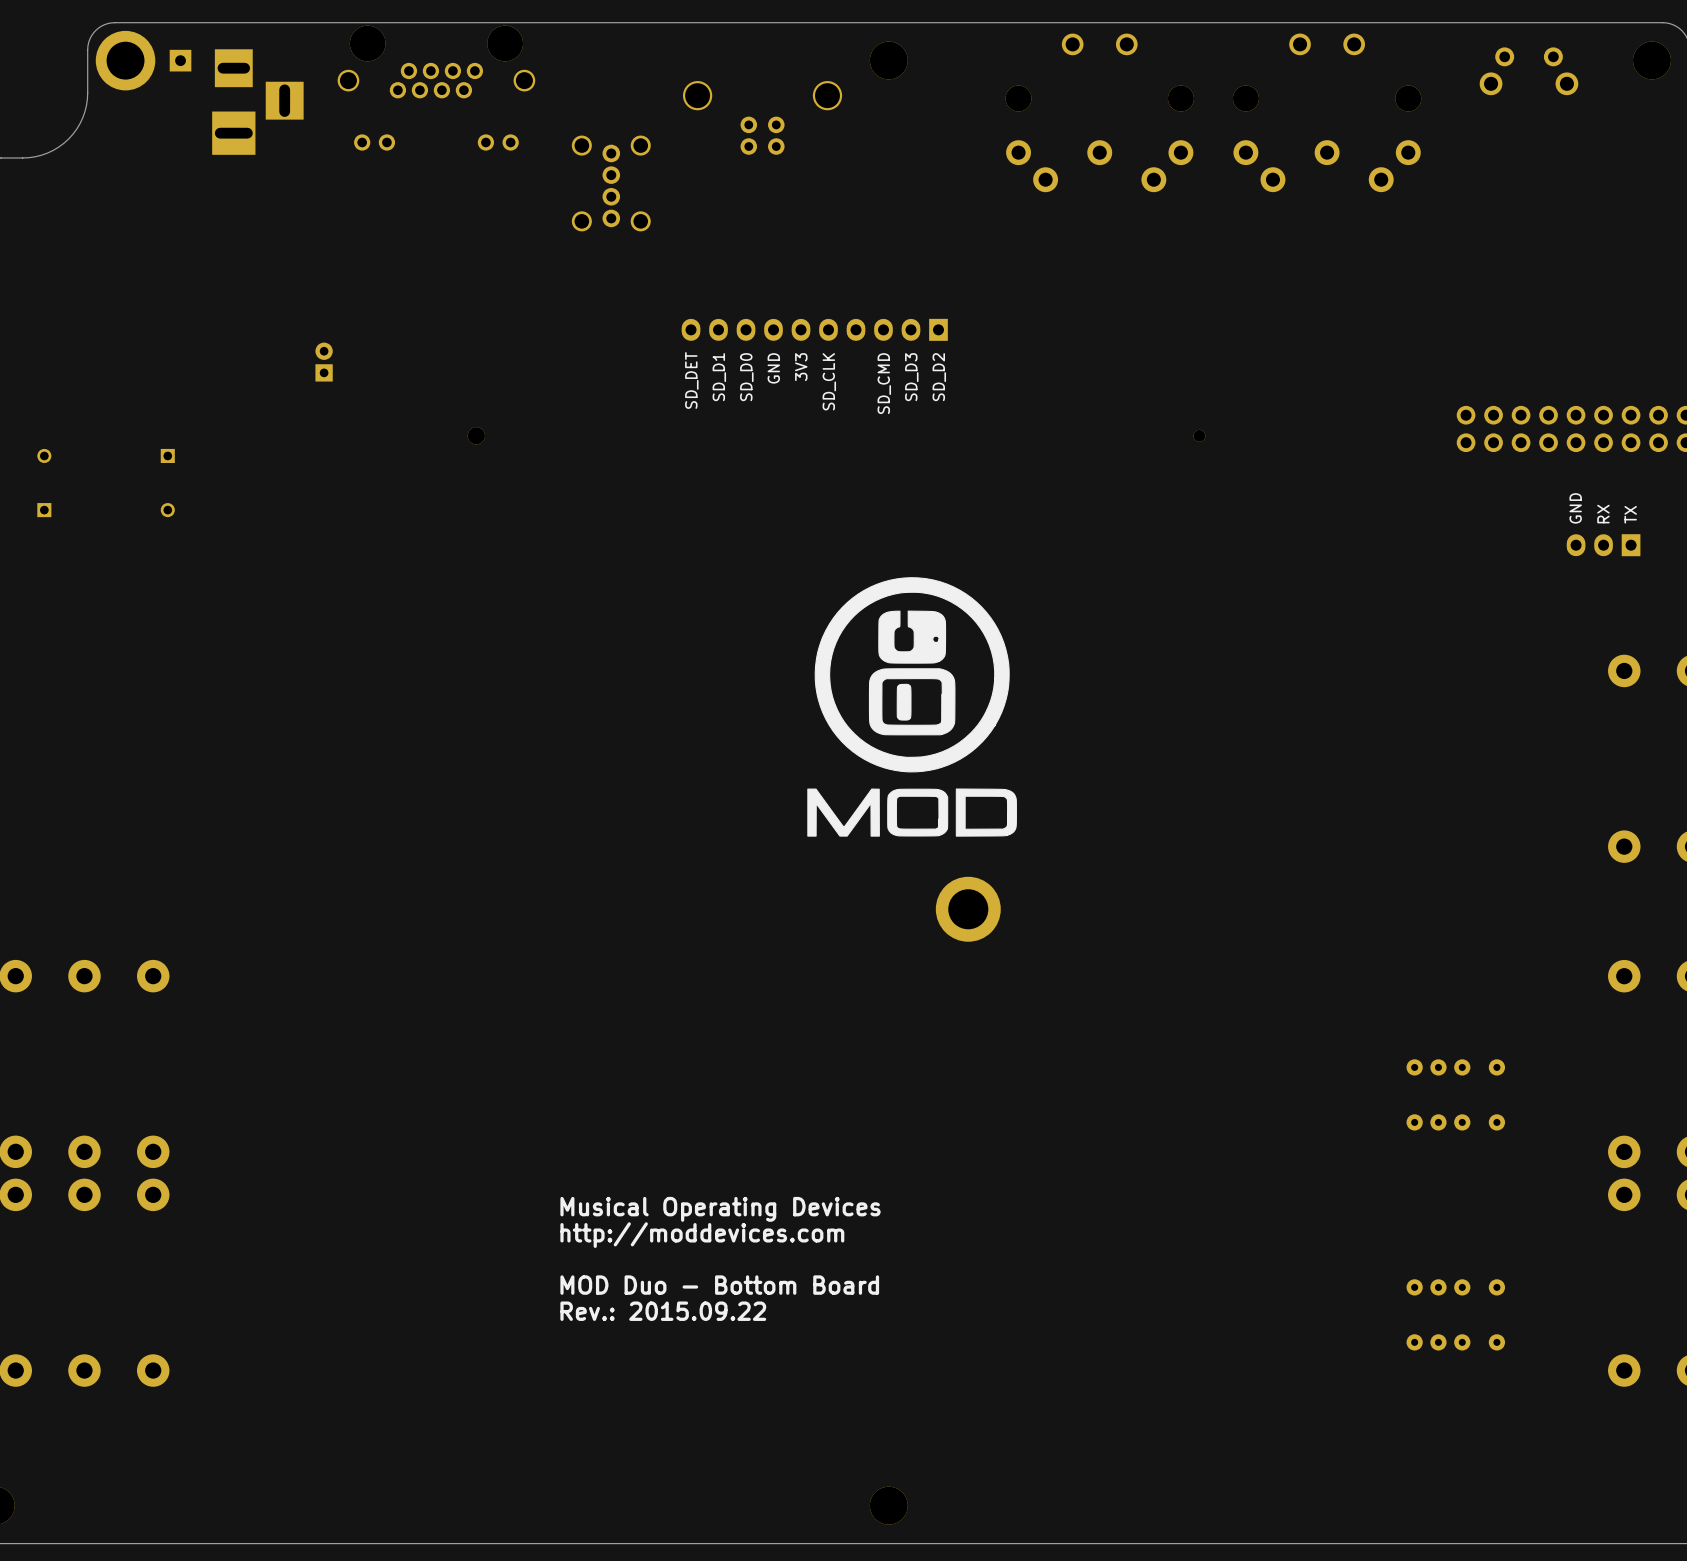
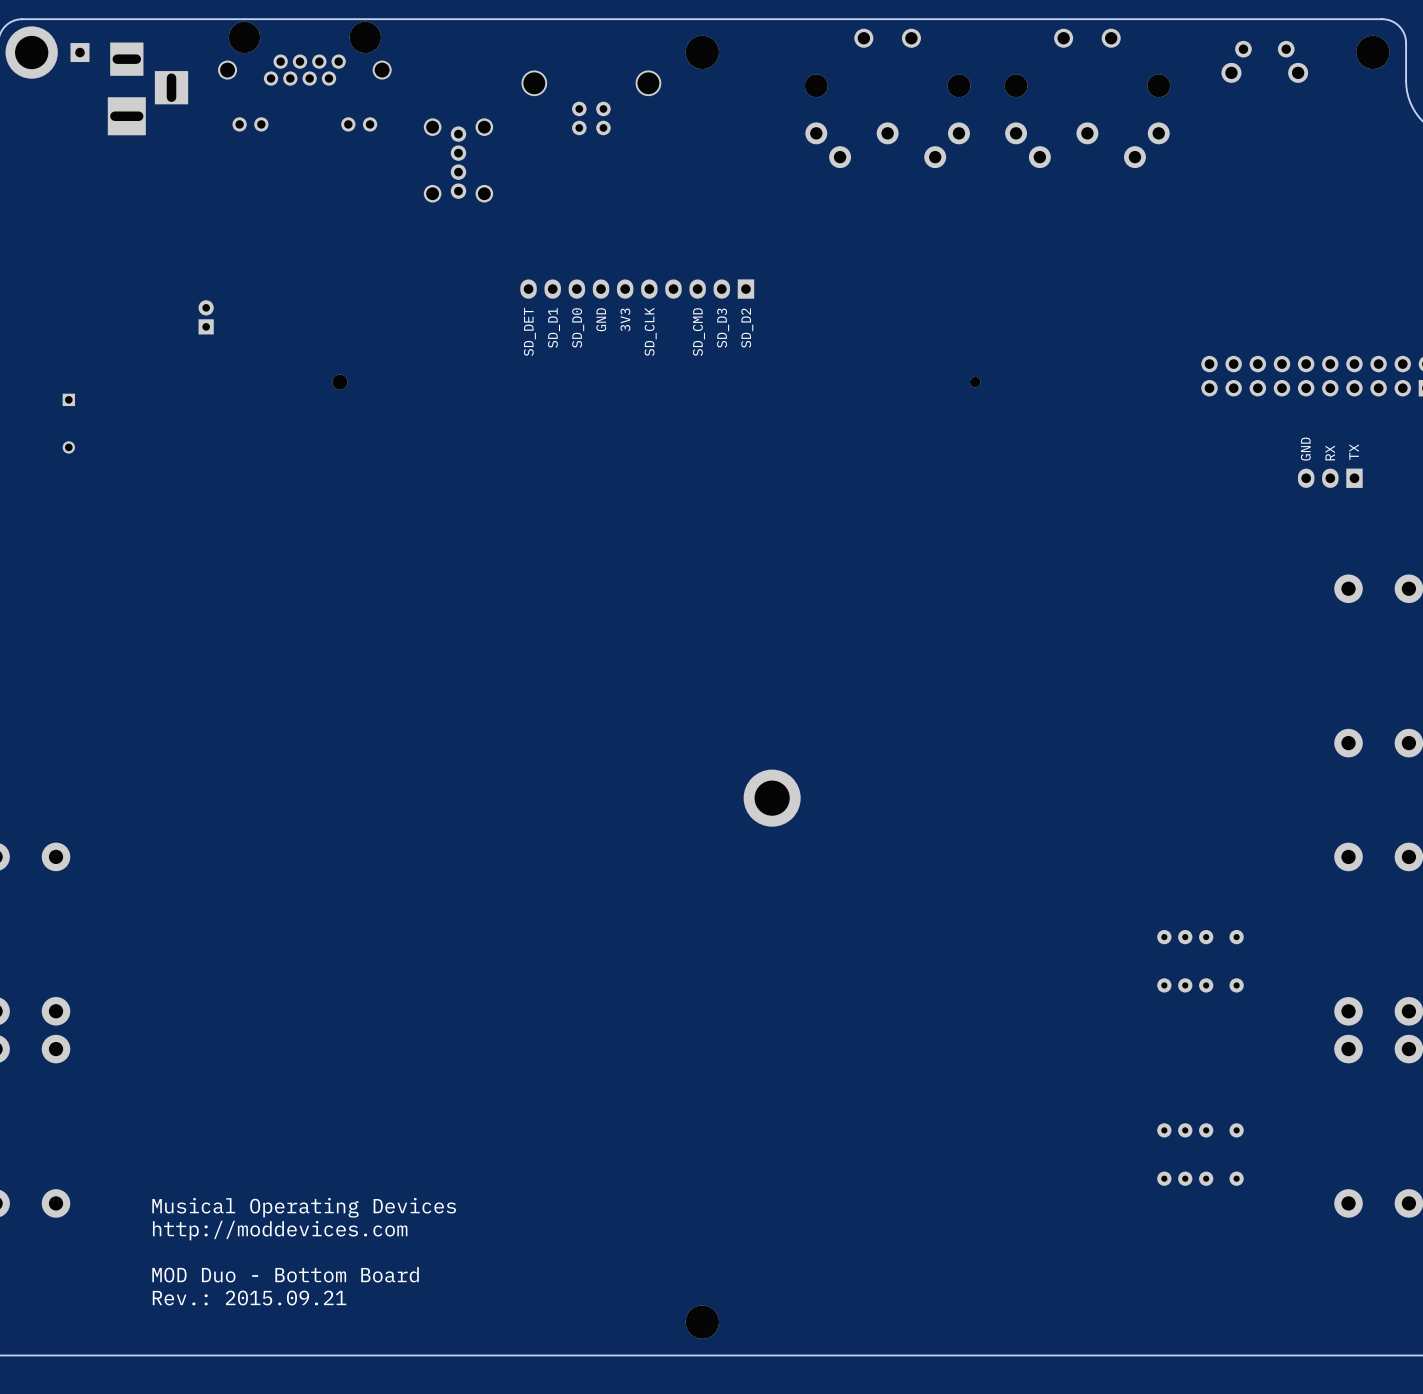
drawing: [807, 577, 1017, 837] -> none
text: Musical Operating Devices (720, 1209) -> none
text: http://moddevices.com (702, 1235) -> none
text: MOD Duo - Bottom Board (719, 1285) -> none
text: Rev.: 2015.09.22 (663, 1311) -> none
text: none -> Musical Operating Devices (304, 1207)
text: none -> http://moddevices.com (280, 1230)
text: none -> MOD Duo - Bottom Board (285, 1274)
text: none -> Rev.: 2015.09.21 (249, 1298)

